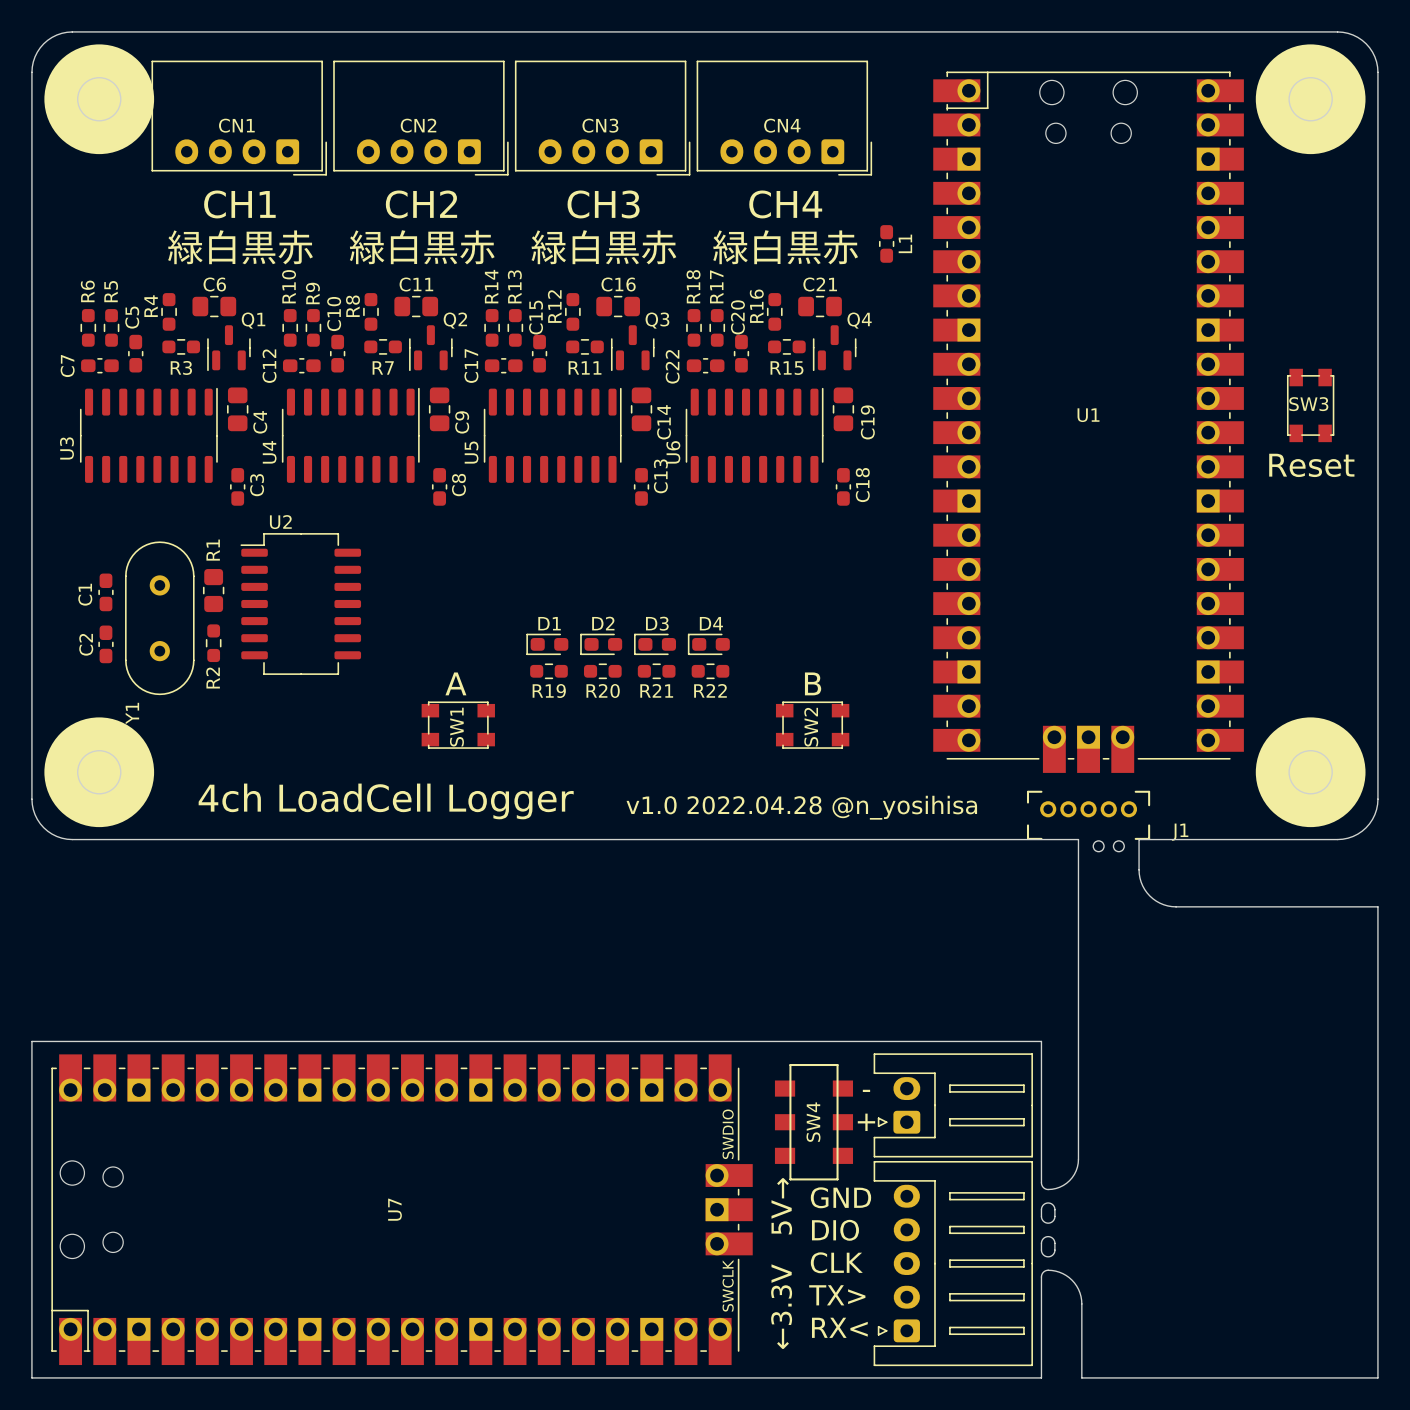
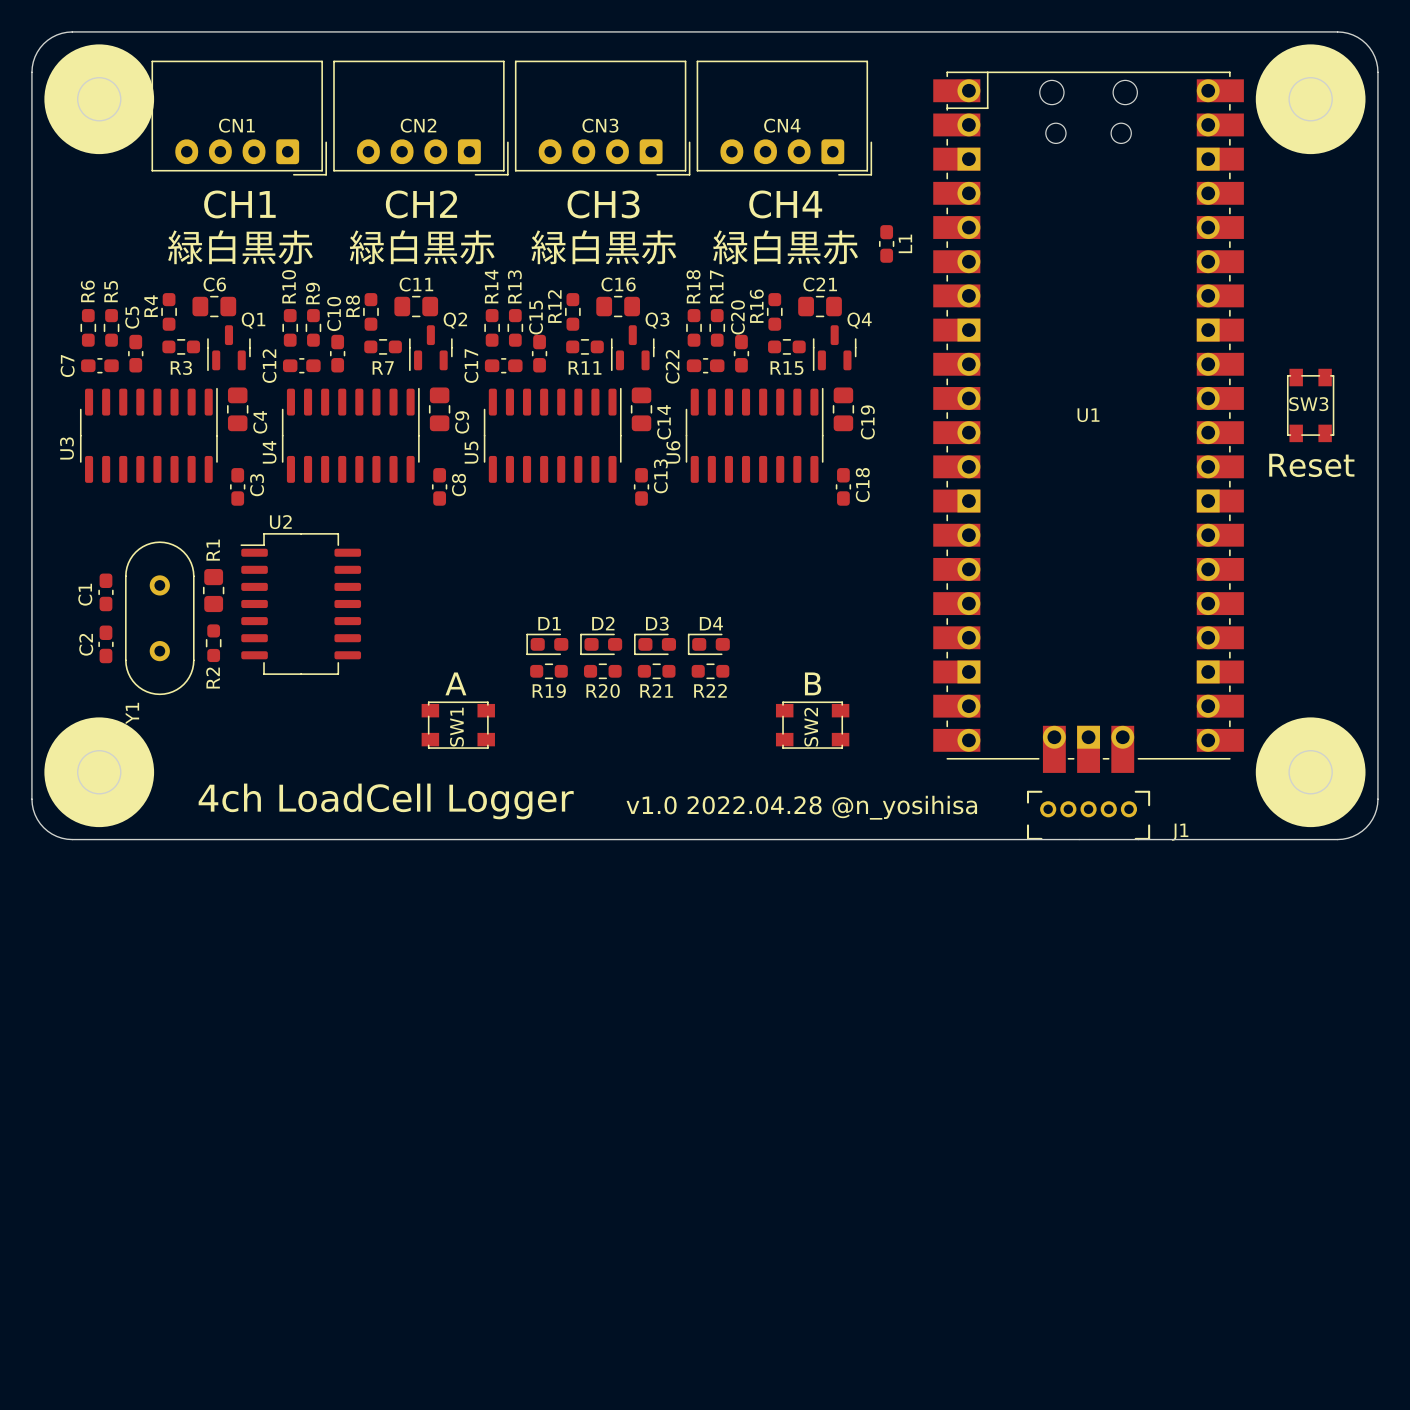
board edge: (1078, 839) (1078, 1159) (1074, 1174) (1063, 1185) (1047, 1189) (1041, 1183) (1041, 1041) (31, 1041) (31, 1377) (1041, 1377) (1041, 1277) (1043, 1272) (1048, 1270) (1066, 1275) (1074, 1282) (1079, 1292) (1081, 1303) (1081, 1377) (1377, 1377) (1377, 906) (1167, 905) (1152, 898) (1142, 885) (1139, 873) (1139, 839) -> (1078, 839) (1139, 839)
round board edge: [1092, 840, 1105, 853] -> none
round board edge: [1112, 840, 1125, 853] -> none
text: - (866, 1090) -> none
part: (953, 1105) -> none
SW4: (813, 1122) -> none
text: + (866, 1122) -> none
text: GND (840, 1197) -> none
U7: (402, 1209) -> none
board edge: (1041, 1209) (1043, 1221) (1048, 1223) (1052, 1221) (1054, 1216) (1052, 1204) (1045, 1203) (1041, 1209) -> none
text: DIO (835, 1230) -> none
board edge: (1041, 1243) (1043, 1254) (1048, 1256) (1052, 1254) (1054, 1250) (1052, 1238) (1045, 1237) (1041, 1243) -> none
text: CLK (836, 1262) -> none
text: ←3.3V 5V→ (781, 1263) -> none
part: (953, 1263) -> none
text: TX> (837, 1295) -> none
text: RX< (839, 1327) -> none

